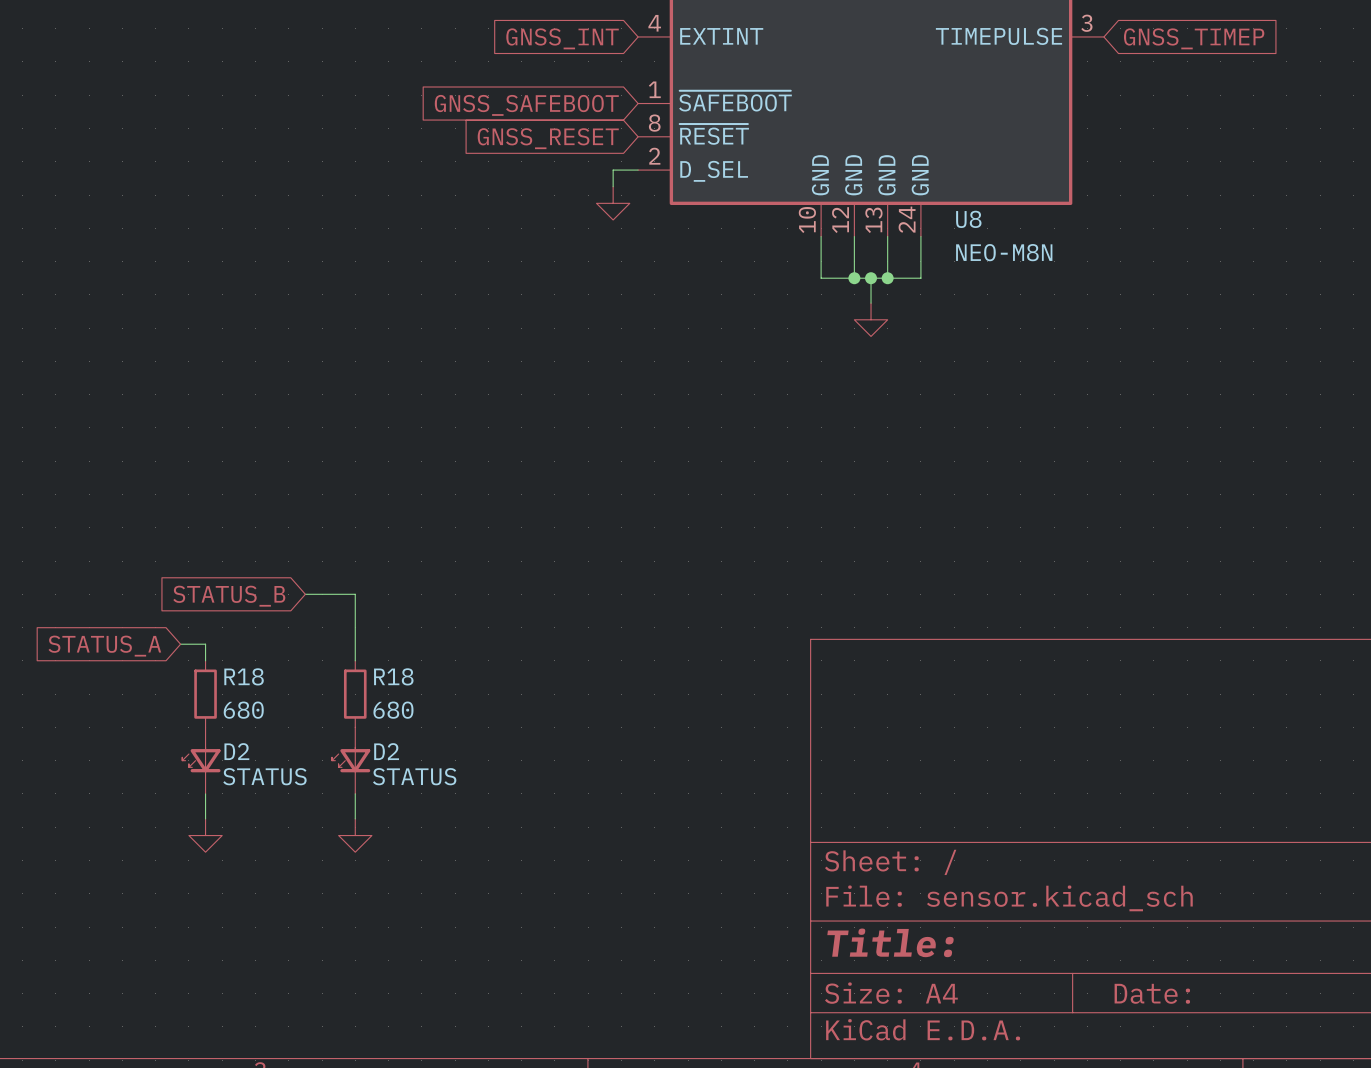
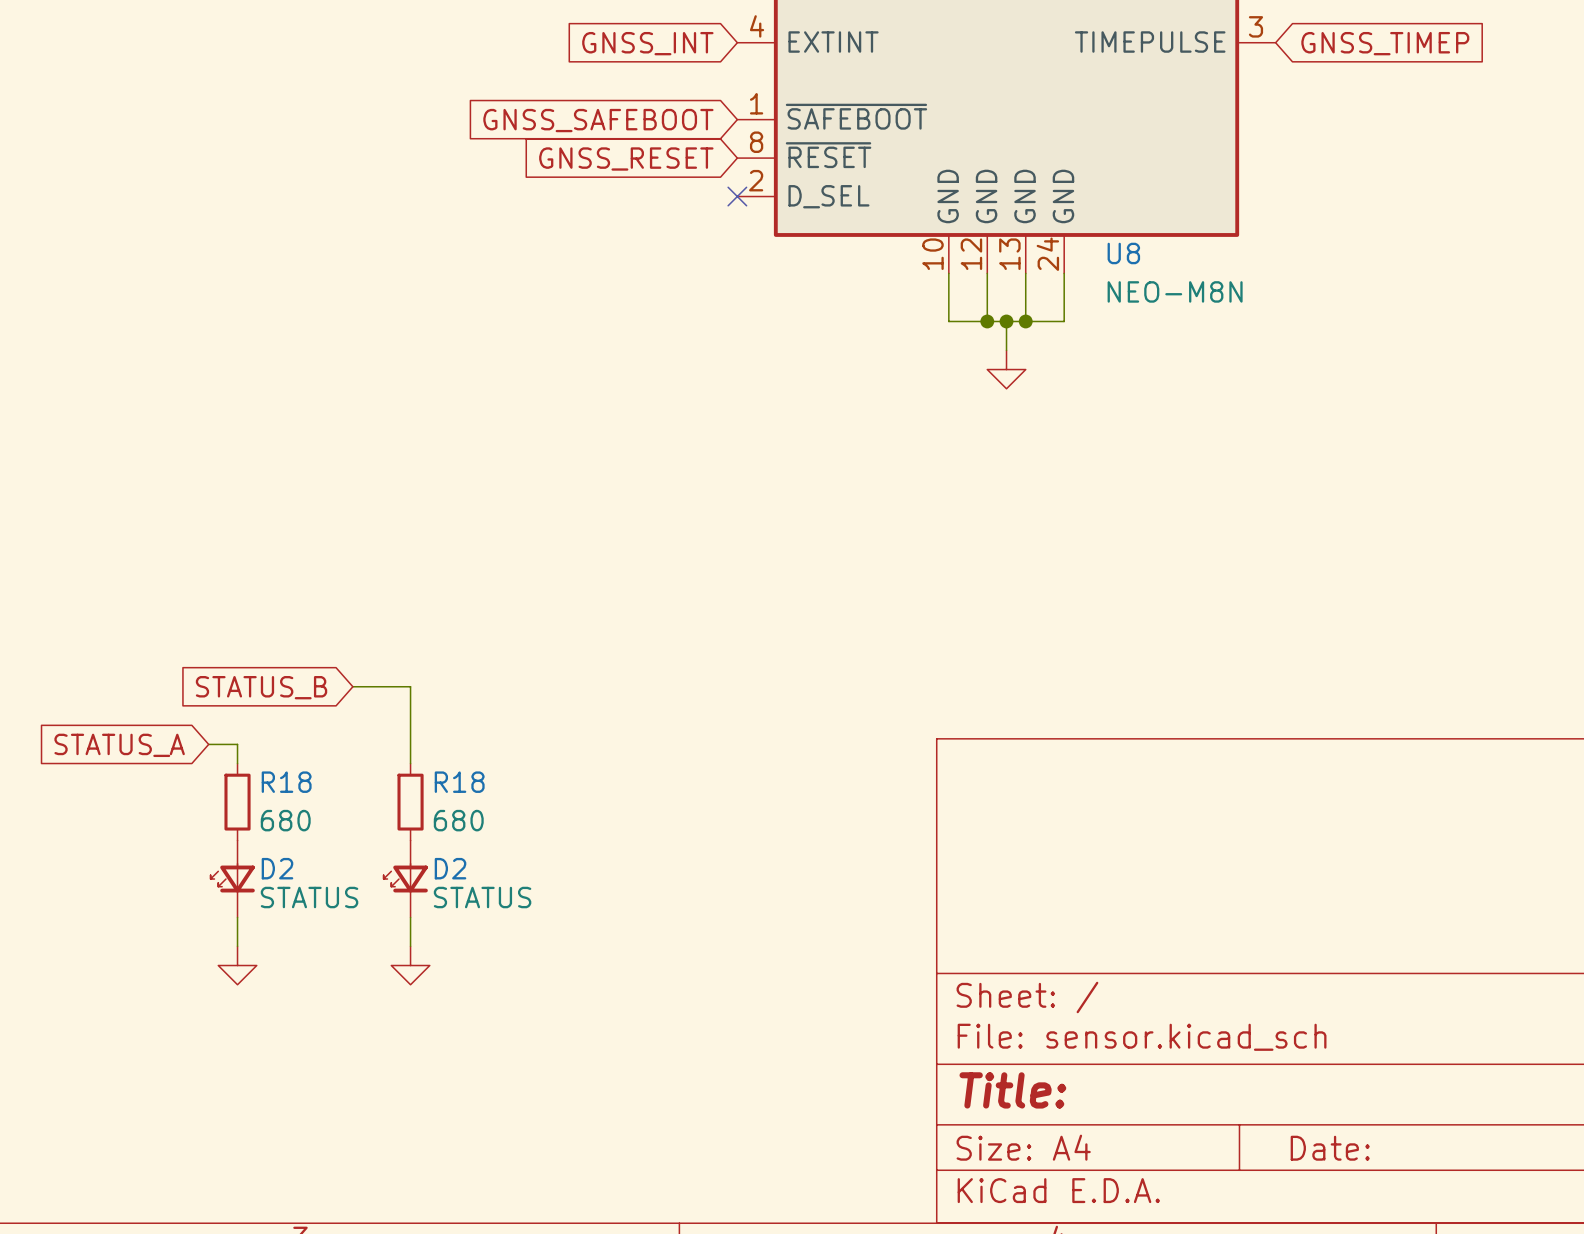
wire: (638, 170) (613, 170) (613, 186) -> none
no-connect mark: none -> (737, 196)
power symbol: (613, 203) -> none

